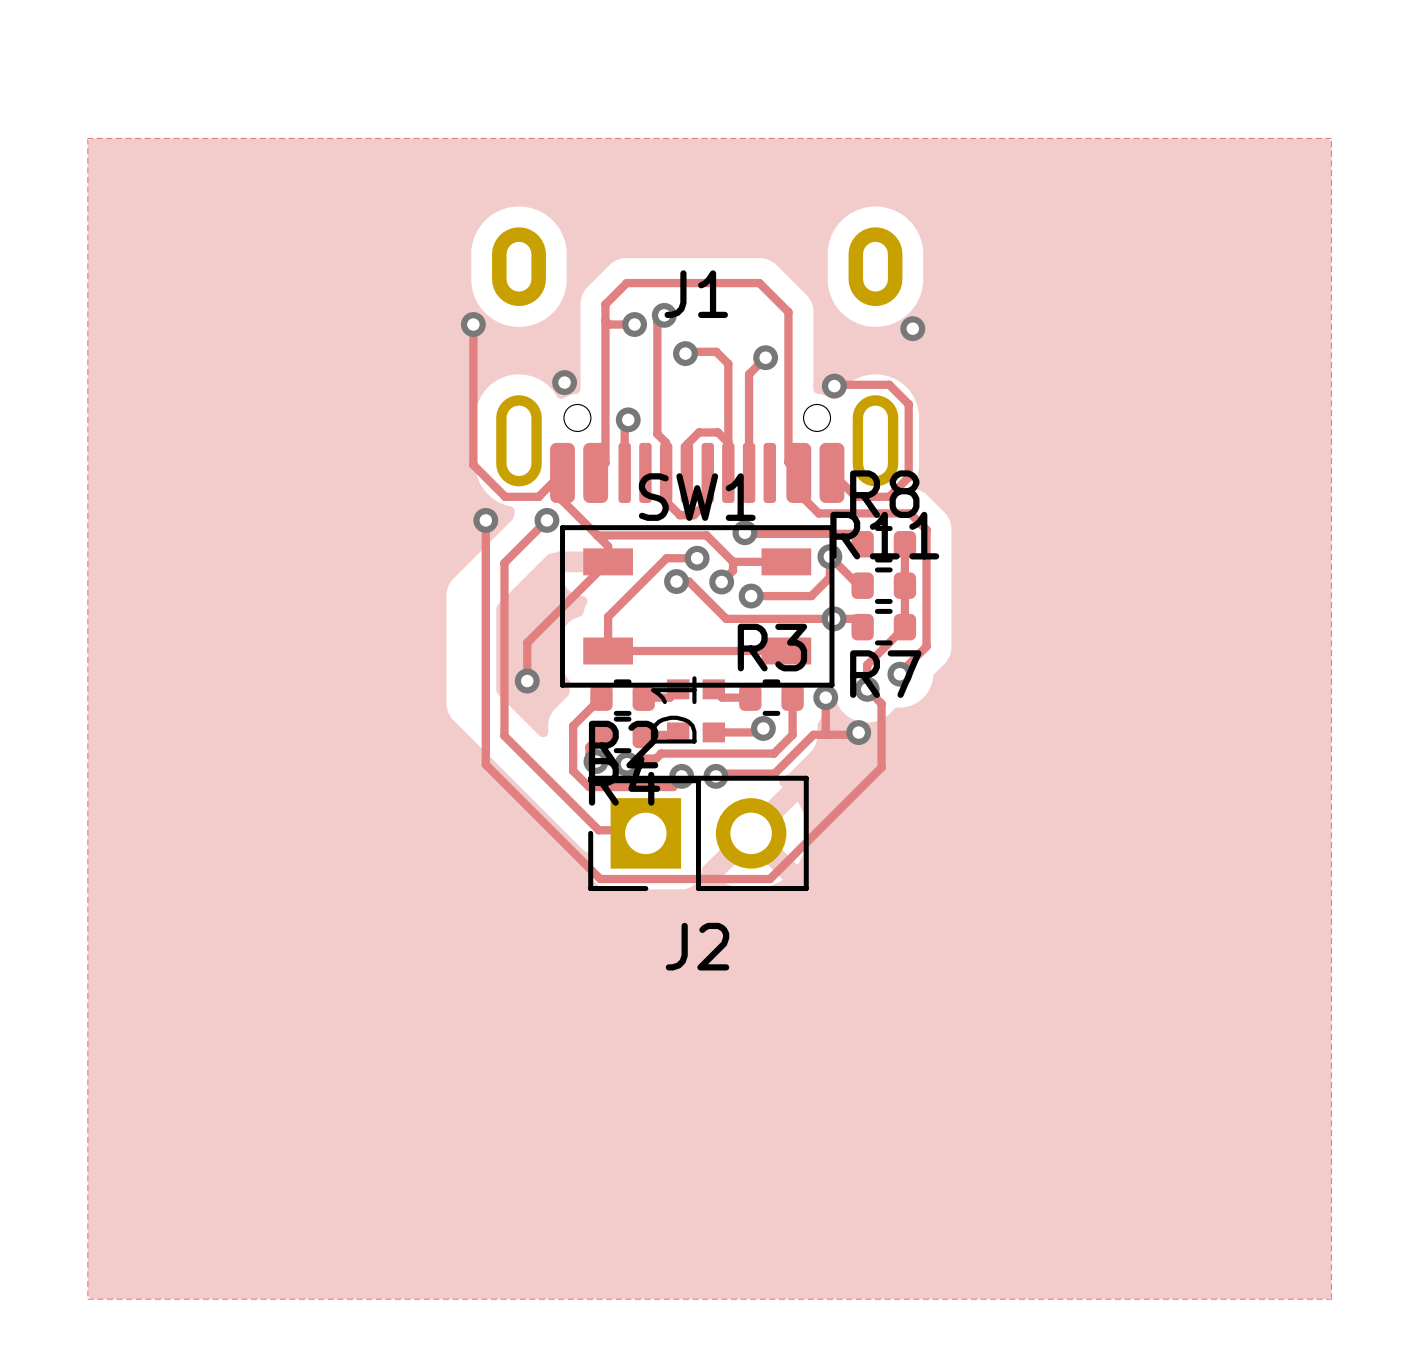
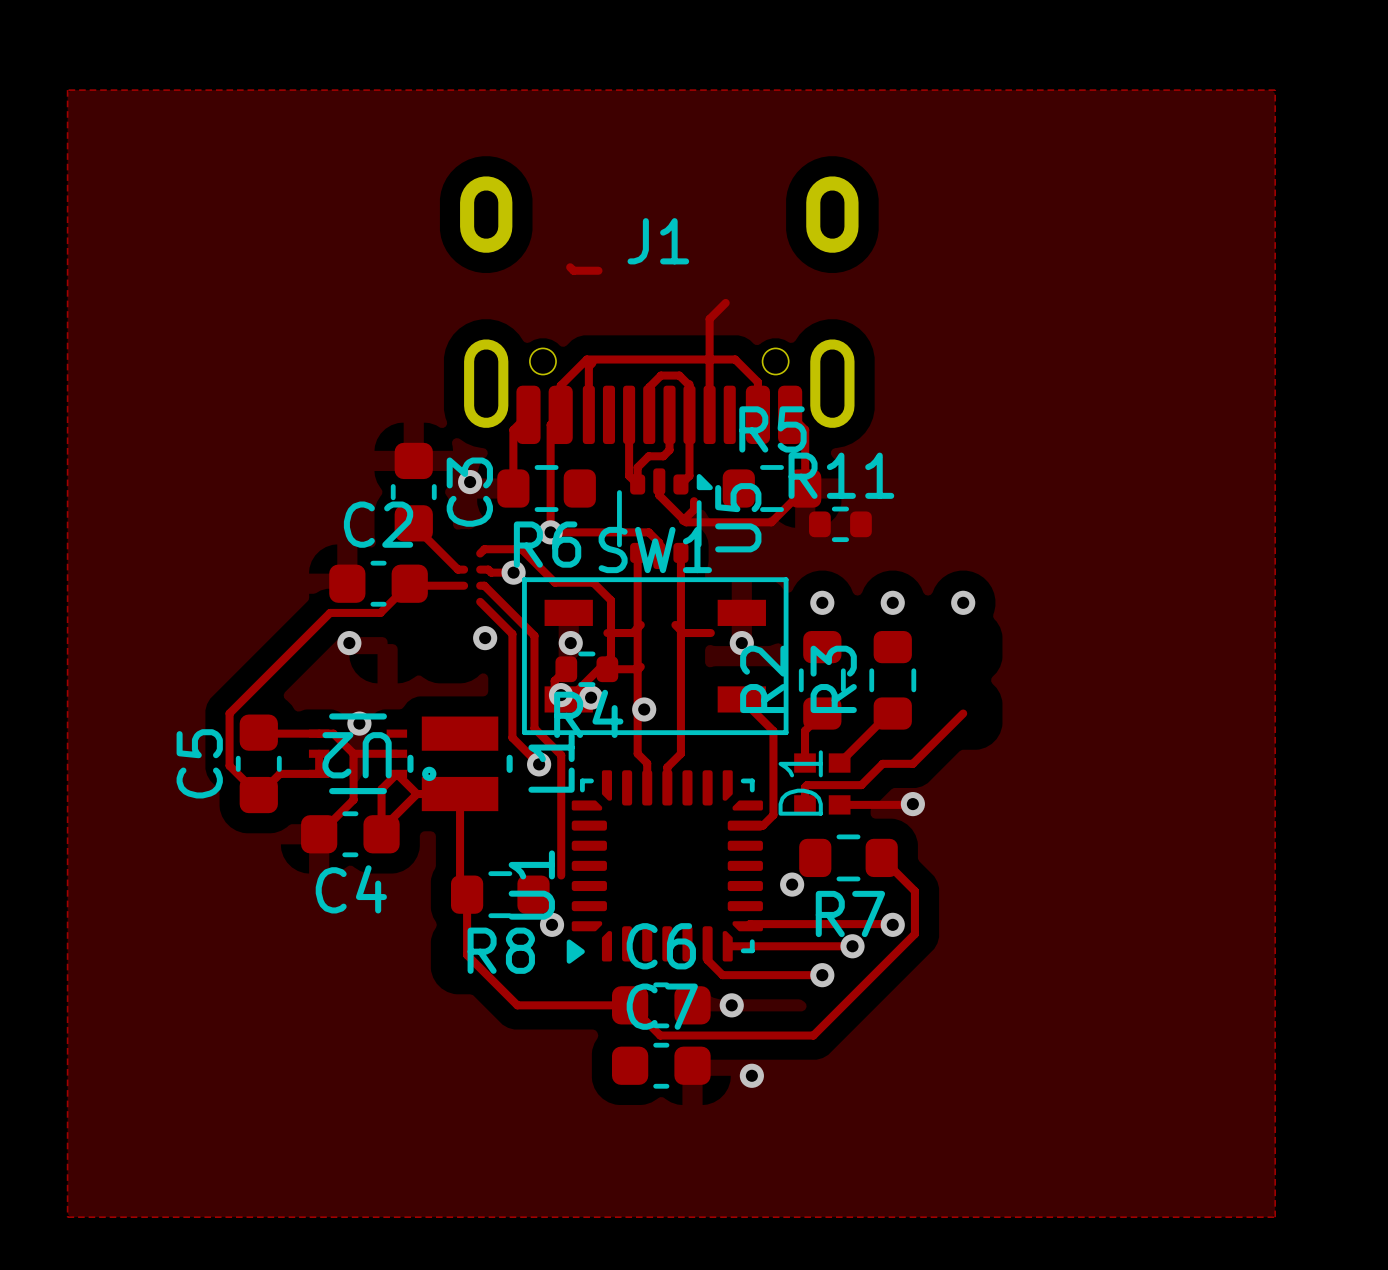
track: (664, 315) (657, 322) (657, 434) (666, 442) (666, 472) -> none
via: (664, 315) -> none
track: (473, 324) (473, 464) (505, 496) (538, 496) (546, 488) -> (513, 488) (513, 429)
via: (473, 324) -> none
via: (634, 324) -> none
via: (912, 328) -> none
track: (685, 353) (687, 351) (716, 351) (728, 363) (728, 441) -> none
via: (685, 353) -> none
via: (765, 357) -> none
via: (564, 382) -> none
track: (834, 386) (889, 384) (908, 404) (908, 477) (889, 496) (855, 496) (847, 488) -> (659, 481) (659, 495) (686, 522) (771, 522) (805, 488) (805, 429)
via: (834, 386) -> none
via: (628, 419) -> none
track: (562, 472) (562, 500) (608, 546) (608, 561) (527, 642) (527, 681) -> none
track: (595, 472) (605, 463) (605, 304) (626, 283) (759, 283) (788, 312) (788, 462) (798, 472) (798, 493) (818, 513) (910, 513) (926, 529) (926, 646) (899, 674) -> none
track: none -> (689, 414) (689, 475) (680, 484)
track: none -> (757, 414) (757, 382) (735, 359) (586, 359) (560, 385) (560, 414) (550, 424) (550, 532) (648, 532) (659, 542) (659, 555)
R8 name position: R8 (884, 494) -> R8 (501, 950)
track: (707, 501) (693, 515) (679, 515) (666, 501) -> (669, 442) (669, 450) (663, 456) (648, 456) (637, 467) (637, 484) (629, 475) (629, 442)
track: (485, 520) (485, 764) (600, 879) (770, 879) (881, 767) (881, 703) (867, 689) (867, 664) (904, 627) (904, 544) -> none
via position: (485, 520) -> (470, 482)
track: (546, 520) (504, 562) (504, 735) (598, 830) (645, 830) -> none
via: (546, 520) -> none
R8 footprint: [851, 525, 917, 563] -> [450, 871, 550, 919]
track: (744, 532) (852, 533) (862, 544) -> none
via: (744, 532) -> none
track: (597, 535) (706, 535) (733, 561) (786, 561) -> none
R6: none -> (546, 488)
R5: none -> (772, 488)
C3: none -> (413, 492)
via: (829, 556) -> none
track: (697, 558) (666, 558) (608, 616) (608, 650) (786, 650) -> none
via: (697, 558) -> none
U5: none -> (664, 518)
track: (676, 581) (688, 581) (726, 618) (854, 618) (862, 627) -> none
via: (676, 581) -> none
via: (721, 582) -> none
track: none -> (413, 523) (458, 569) (464, 569)
track: (862, 585) (858, 585) (829, 556) (829, 577) (811, 596) (751, 596) -> none
via: none -> (550, 532)
via: (751, 596) -> none
SW1 position: (697, 606) -> (655, 656)
R7 footprint: [851, 608, 917, 646] -> [799, 834, 898, 882]
track: none -> (480, 553) (484, 549) (521, 549) (555, 582) (593, 582) (610, 600) (610, 657) (568, 699)
track: none -> (637, 552) (637, 753) (647, 763) (647, 787)
track: none -> (680, 552) (680, 753) (667, 767) (667, 787)
via: (834, 618) -> none
track: none -> (480, 569) (488, 569) (491, 572) (513, 572)
via: none -> (513, 572)
C2: none -> (378, 583)
track: none -> (464, 585) (411, 585) (409, 583) (380, 612) (330, 612) (229, 713) (229, 765) (258, 795) (279, 773) (319, 773) (319, 753)
track: none -> (480, 585) (484, 585) (534, 635) (534, 728) (561, 755) (561, 875)
track: none -> (480, 601) (512, 634) (512, 737) (539, 764)
via: none -> (892, 602)
via: none -> (963, 602)
via: (899, 674) -> none
R2 footprint: [590, 679, 655, 716] -> [798, 631, 846, 730]
R3 footprint: [739, 679, 804, 716] -> [869, 631, 917, 730]
via position: (527, 681) -> (485, 638)
via position: (867, 689) -> (822, 602)
track: (601, 697) (573, 725) (573, 771) (589, 787) (673, 787) (681, 776) -> none
track: (792, 697) (792, 734) (773, 753) (661, 753) (656, 758) (641, 758) (633, 766) (626, 764) -> none
track: (825, 697) (825, 734) -> none
via: (825, 697) -> none
via: none -> (349, 643)
via: none -> (570, 643)
D1 position: (695, 710) -> (822, 783)
track: (763, 728) (759, 732) (713, 732) -> none
via position: (763, 728) -> (741, 643)
track: (858, 732) (856, 734) (813, 734) (774, 773) (718, 773) (715, 776) -> none
via: (858, 732) -> none
track: none -> (741, 699) (773, 731) (773, 815) (762, 825) (745, 825)
via: (715, 776) -> none
track: none -> (822, 713) (805, 730) (805, 763)
track: none -> (892, 713) (889, 713) (839, 763)
track: none -> (963, 713) (912, 763) (882, 763) (861, 785) (807, 785) (805, 787) (805, 804)
via: none -> (359, 723)
track: none -> (258, 732) (333, 733) (353, 753)
track: none -> (353, 753) (353, 799) (319, 834)
track: none -> (353, 753) (396, 753)
U2: none -> (372, 753)
C5: none -> (258, 763)
L1: none -> (460, 763)
via: none -> (539, 764)
J2: (698, 833) -> none
track: none -> (416, 794) (396, 773) (381, 789) (381, 834)
track: none -> (416, 794) (460, 794) (460, 887) (467, 894) (467, 955) (517, 1005) (630, 1005) (660, 1035) (813, 1035) (914, 934) (914, 891) (881, 857)
track: none -> (416, 794) (381, 829)
track: none -> (912, 804) (839, 804)
via: none -> (912, 804)
C4: none -> (350, 834)
U1: none -> (664, 866)
via: none -> (792, 884)
via: none -> (552, 924)
track: none -> (892, 924) (749, 924) (747, 926)
via: none -> (892, 924)
track: none -> (707, 943) (707, 960) (722, 975) (822, 975)
track: none -> (727, 946) (852, 946)
via: none -> (852, 946)
via: none -> (822, 975)
C6: none -> (661, 1005)
via: none -> (731, 1005)
C7: none -> (661, 1065)
via: none -> (751, 1075)

